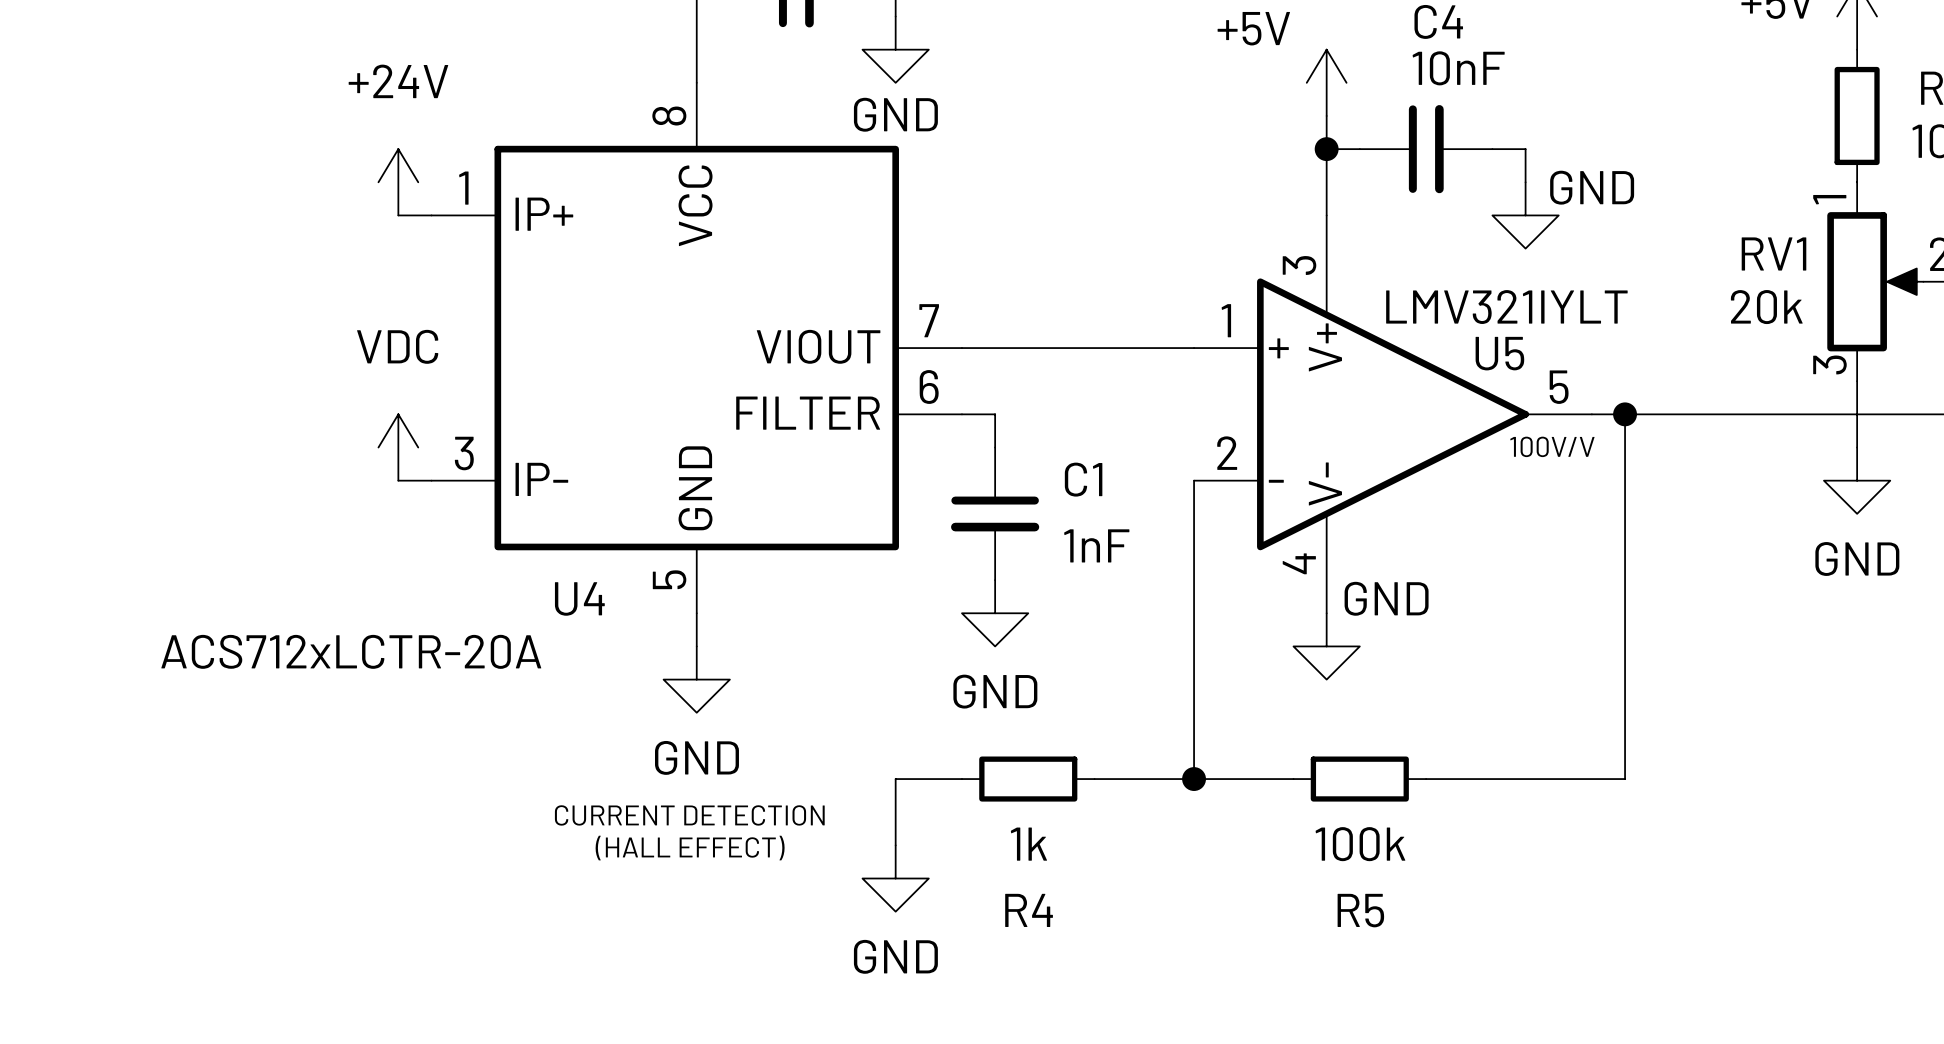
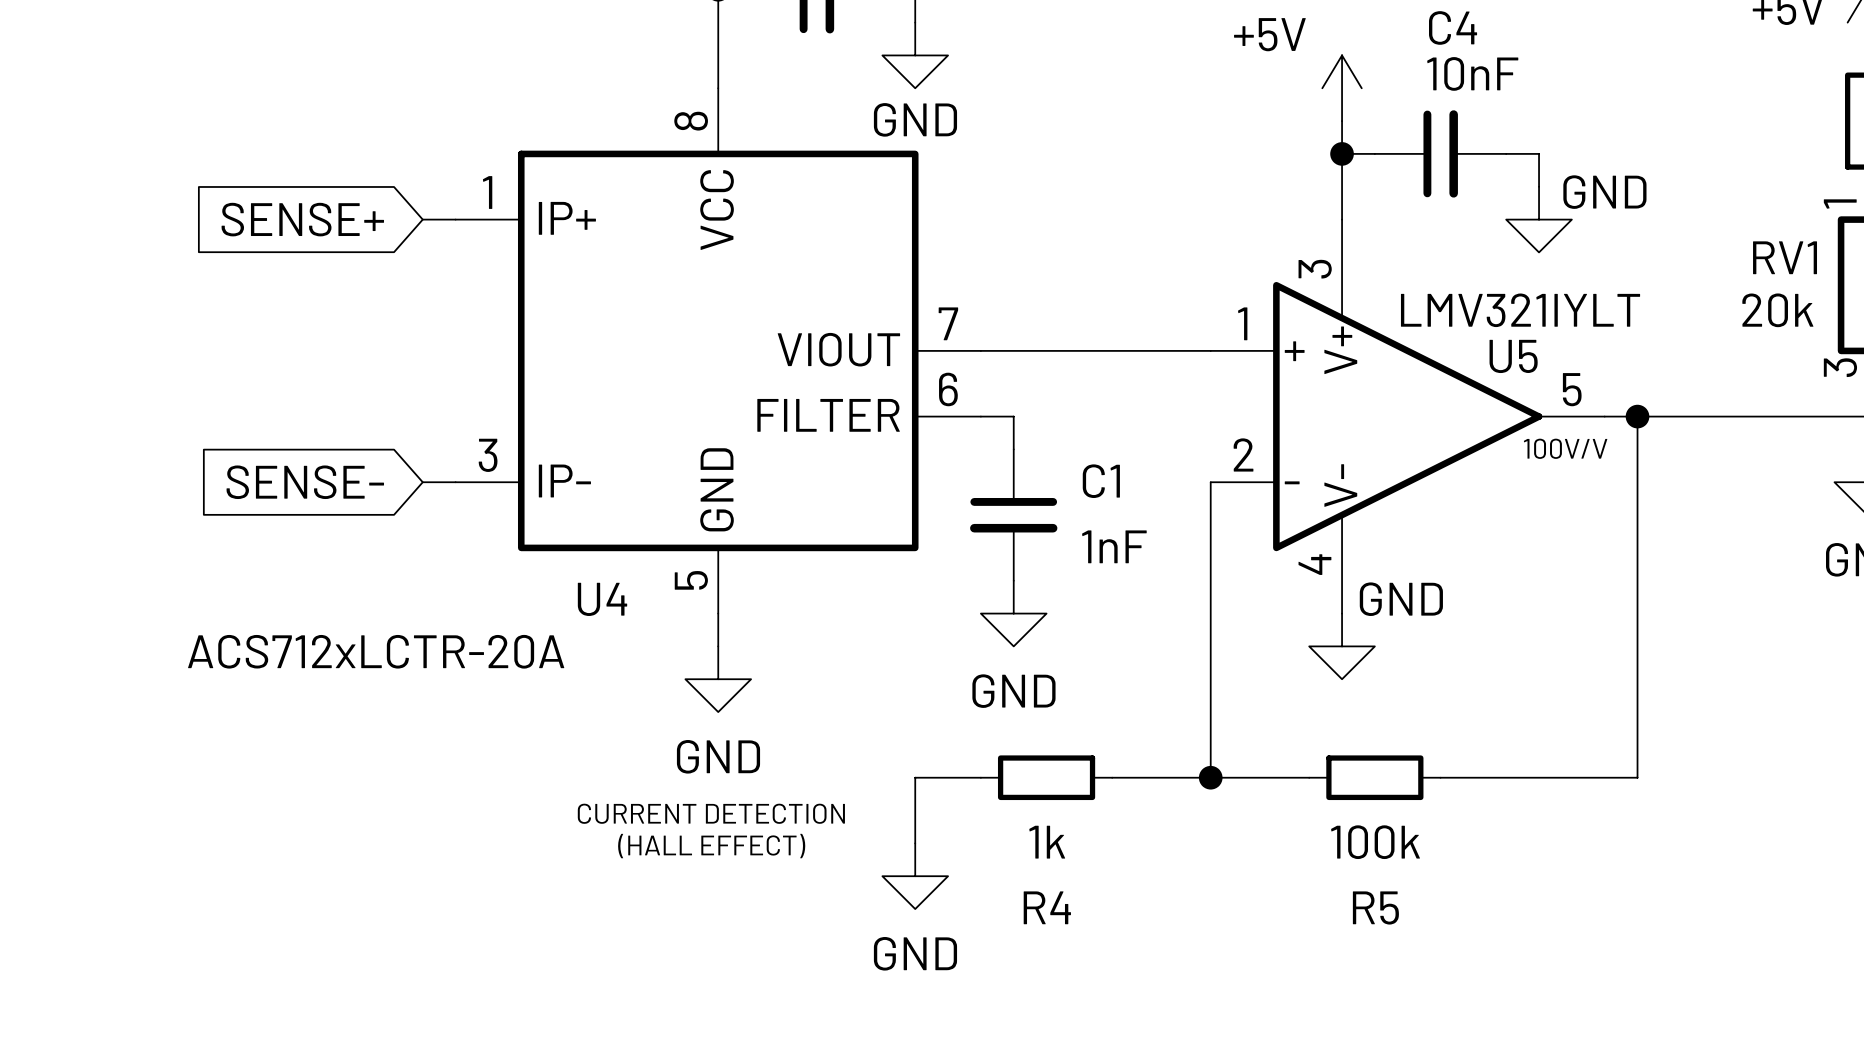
power symbol: +24V (398, 182) -> none
global label: none -> SENSE+ (302, 219)
power symbol: VDC (398, 447) -> none
global label: none -> SENSE- (305, 482)

